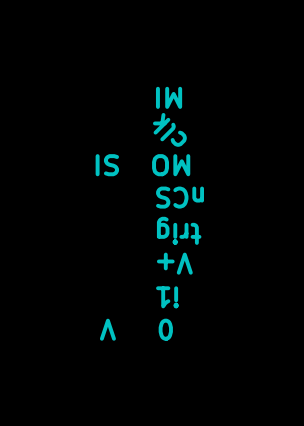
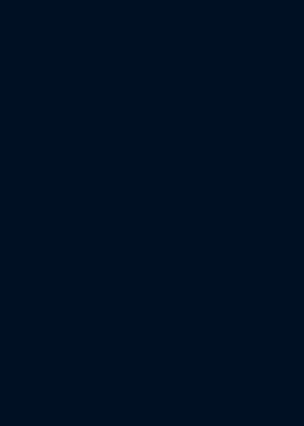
text: MI (169, 97) -> none
text: clk (169, 129) -> none
text: MO SI (142, 165) -> none
text: nCS (180, 197) -> none
text: trig (179, 230) -> none
text: V+ (174, 263) -> none
text: i1 (167, 297) -> none
text: 0 V (136, 329) -> none

